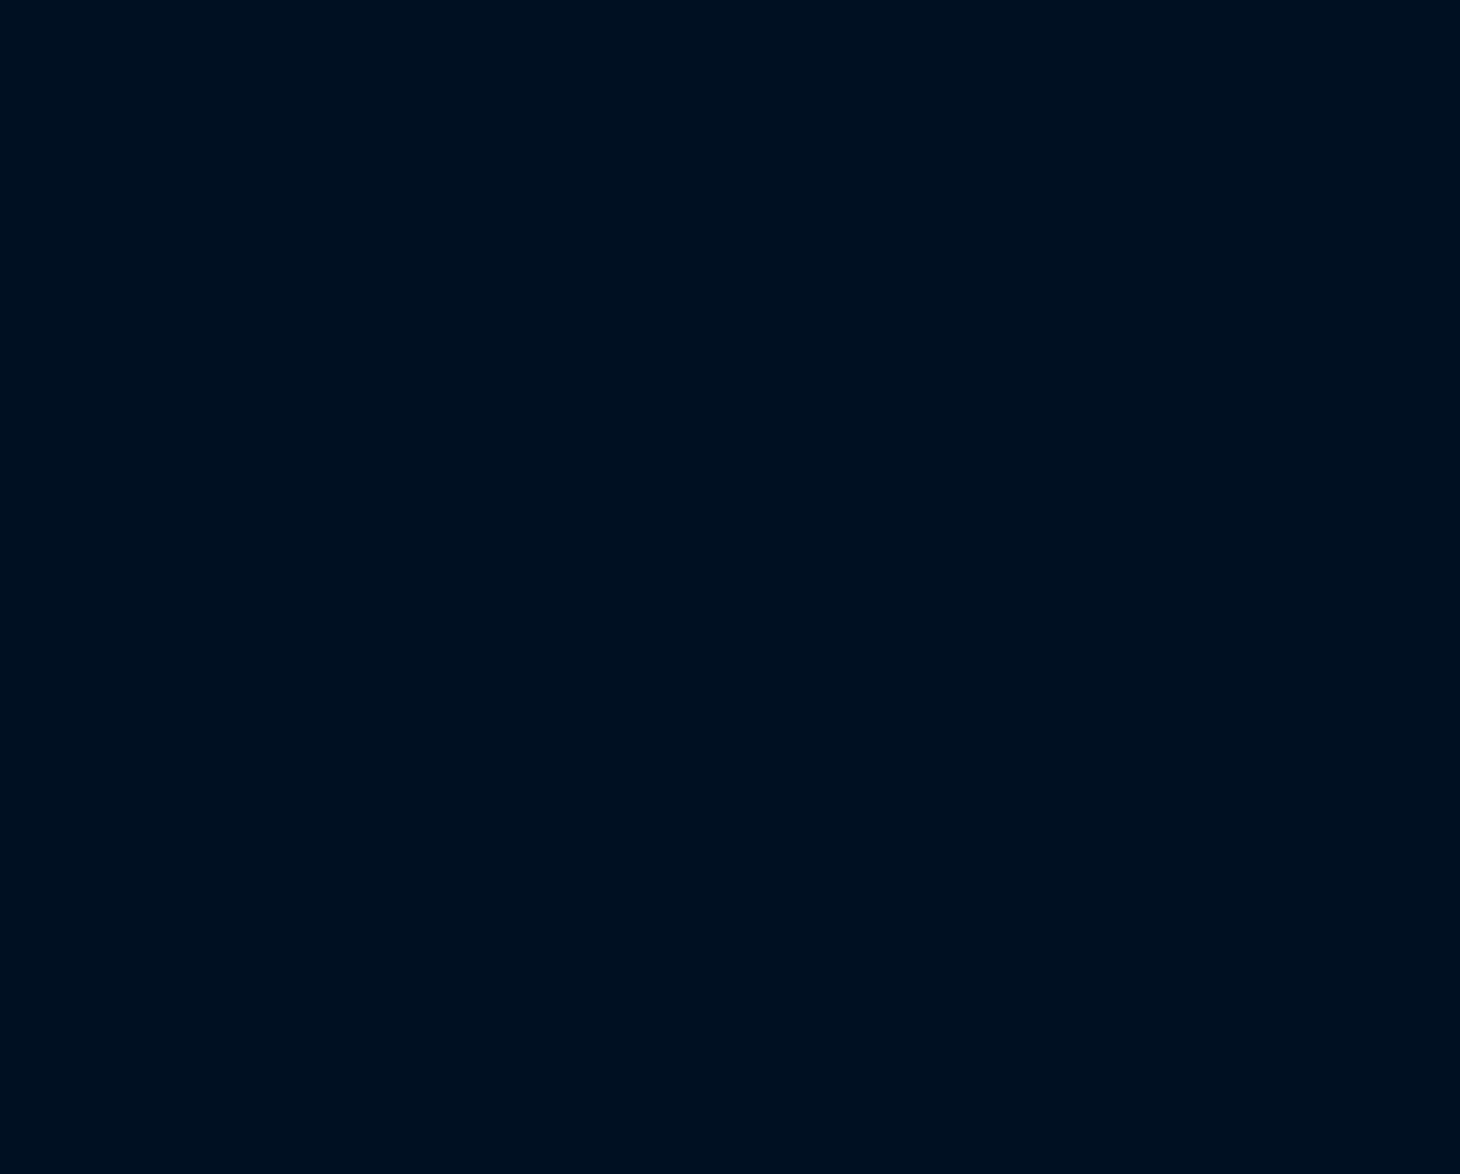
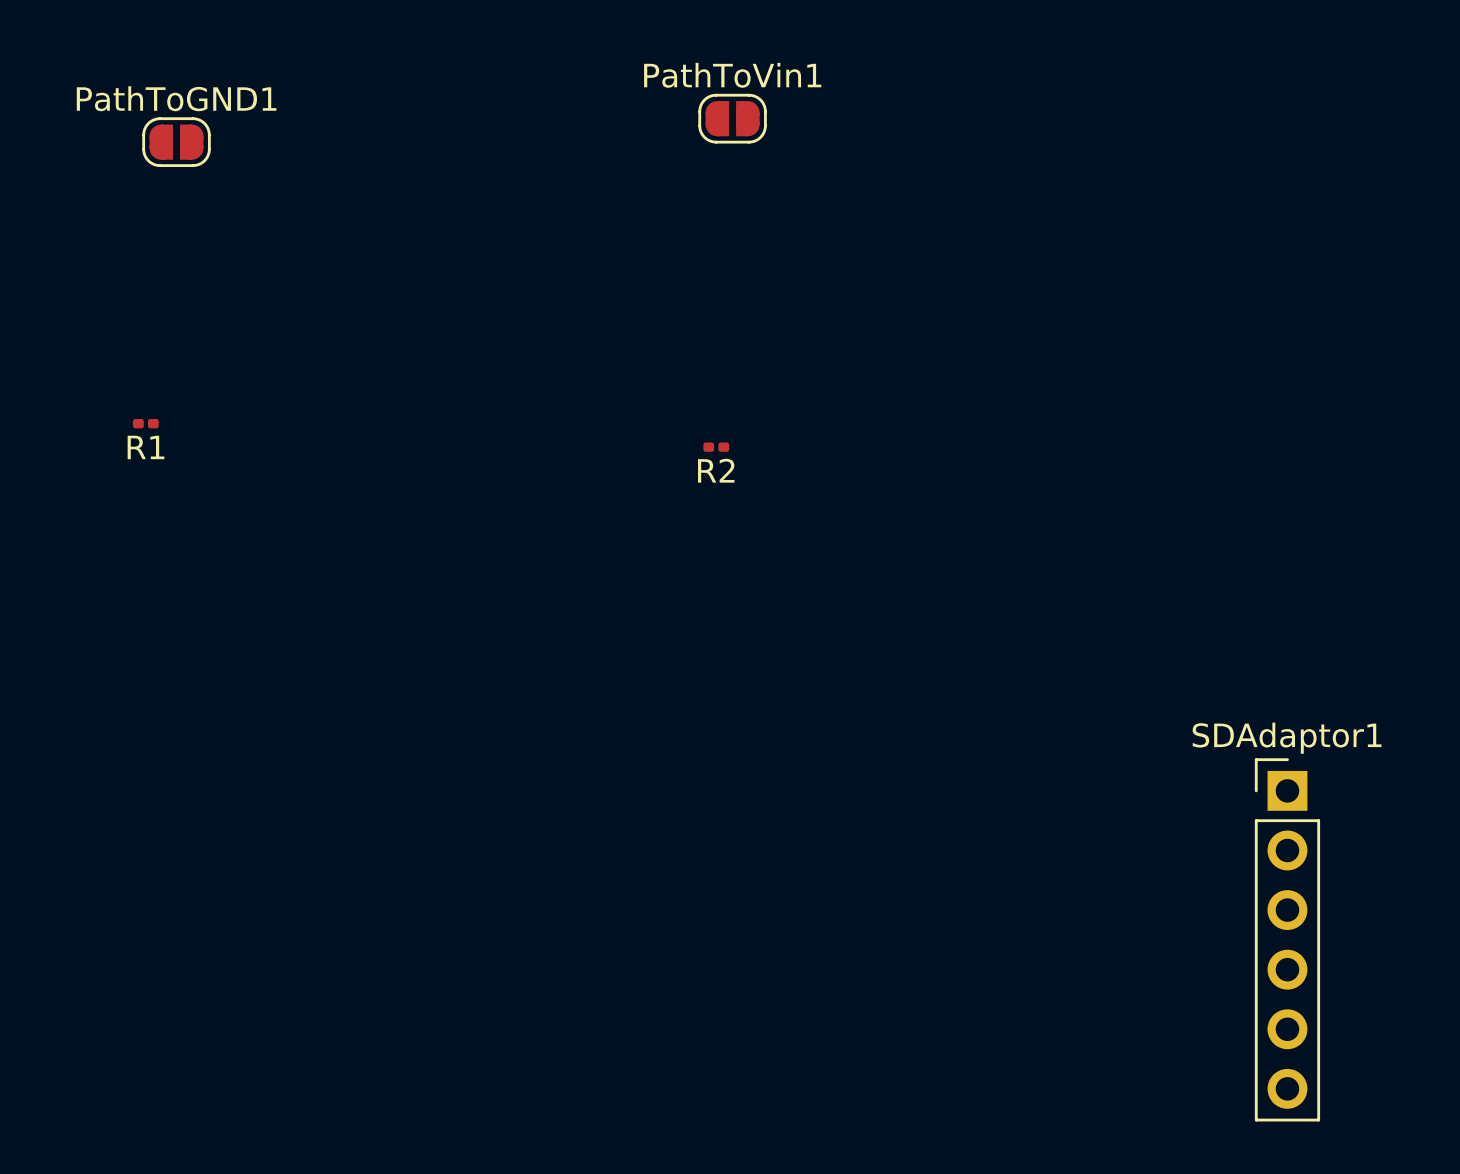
PathToVin1: none -> (732, 118)
PathToGND1: none -> (176, 142)
R1: none -> (145, 423)
R2: none -> (716, 447)
SDAdaptor1: none -> (1287, 939)

